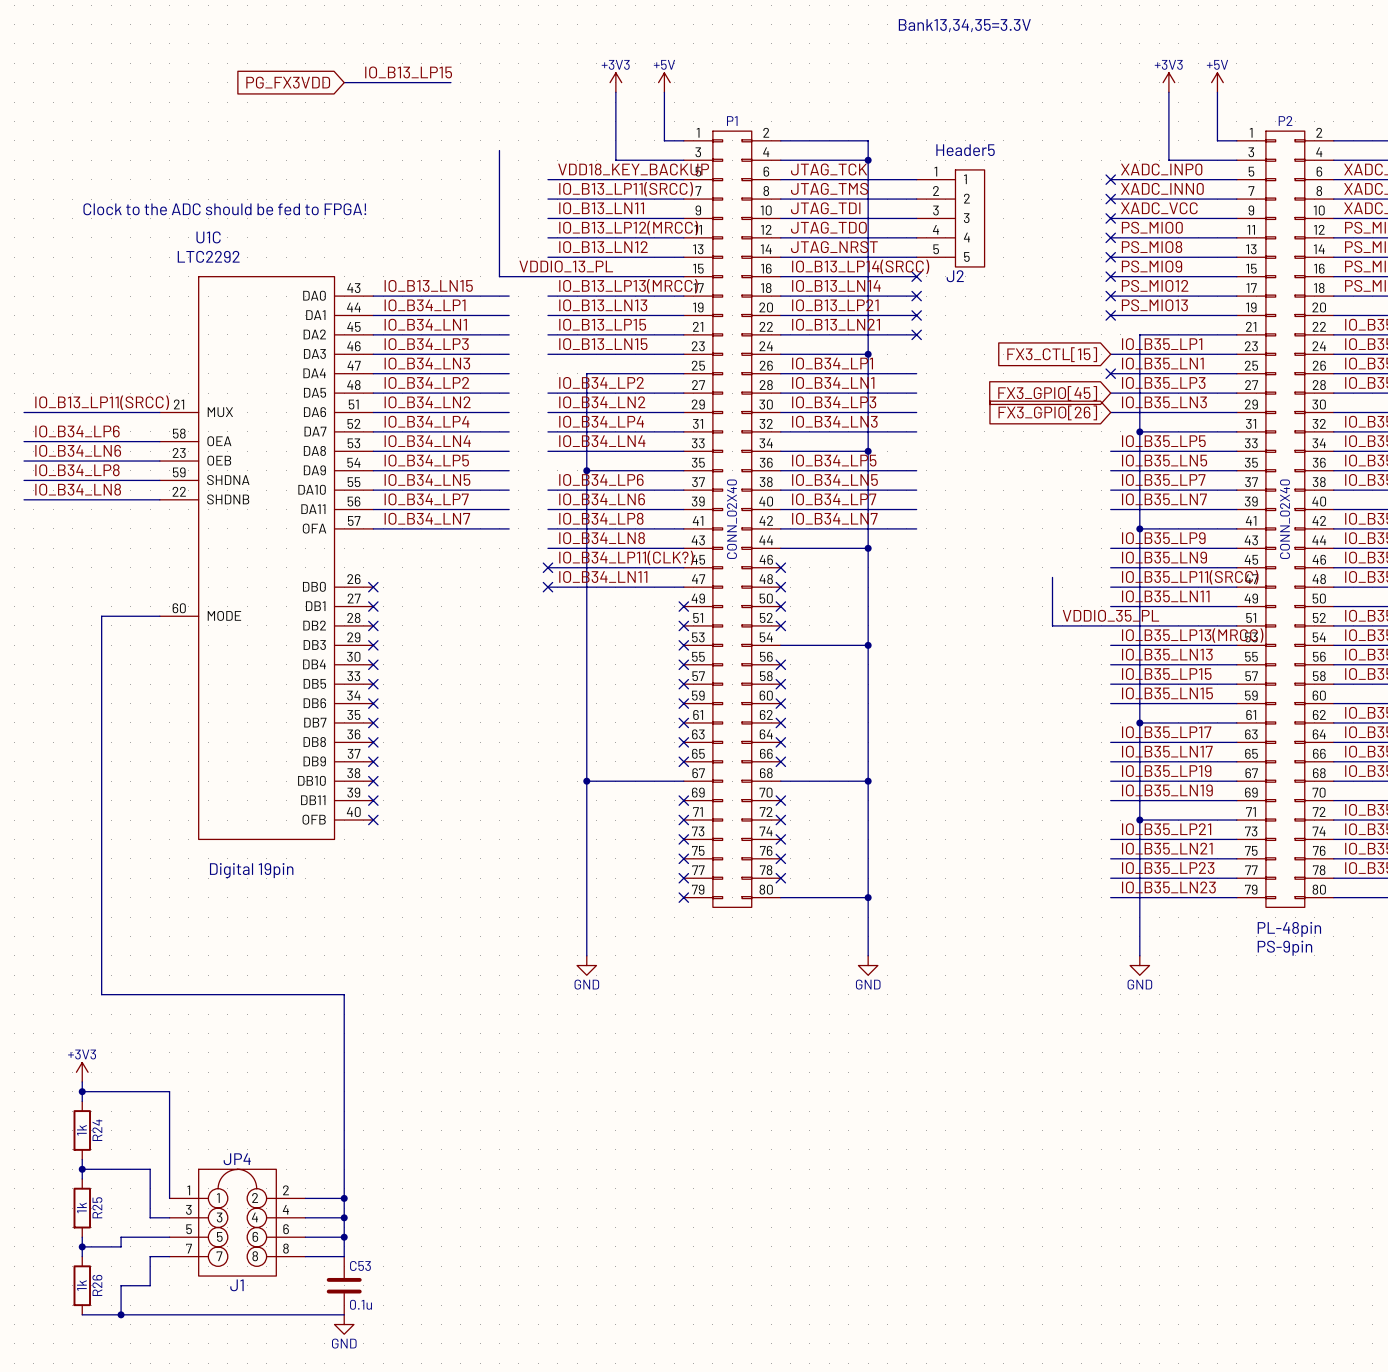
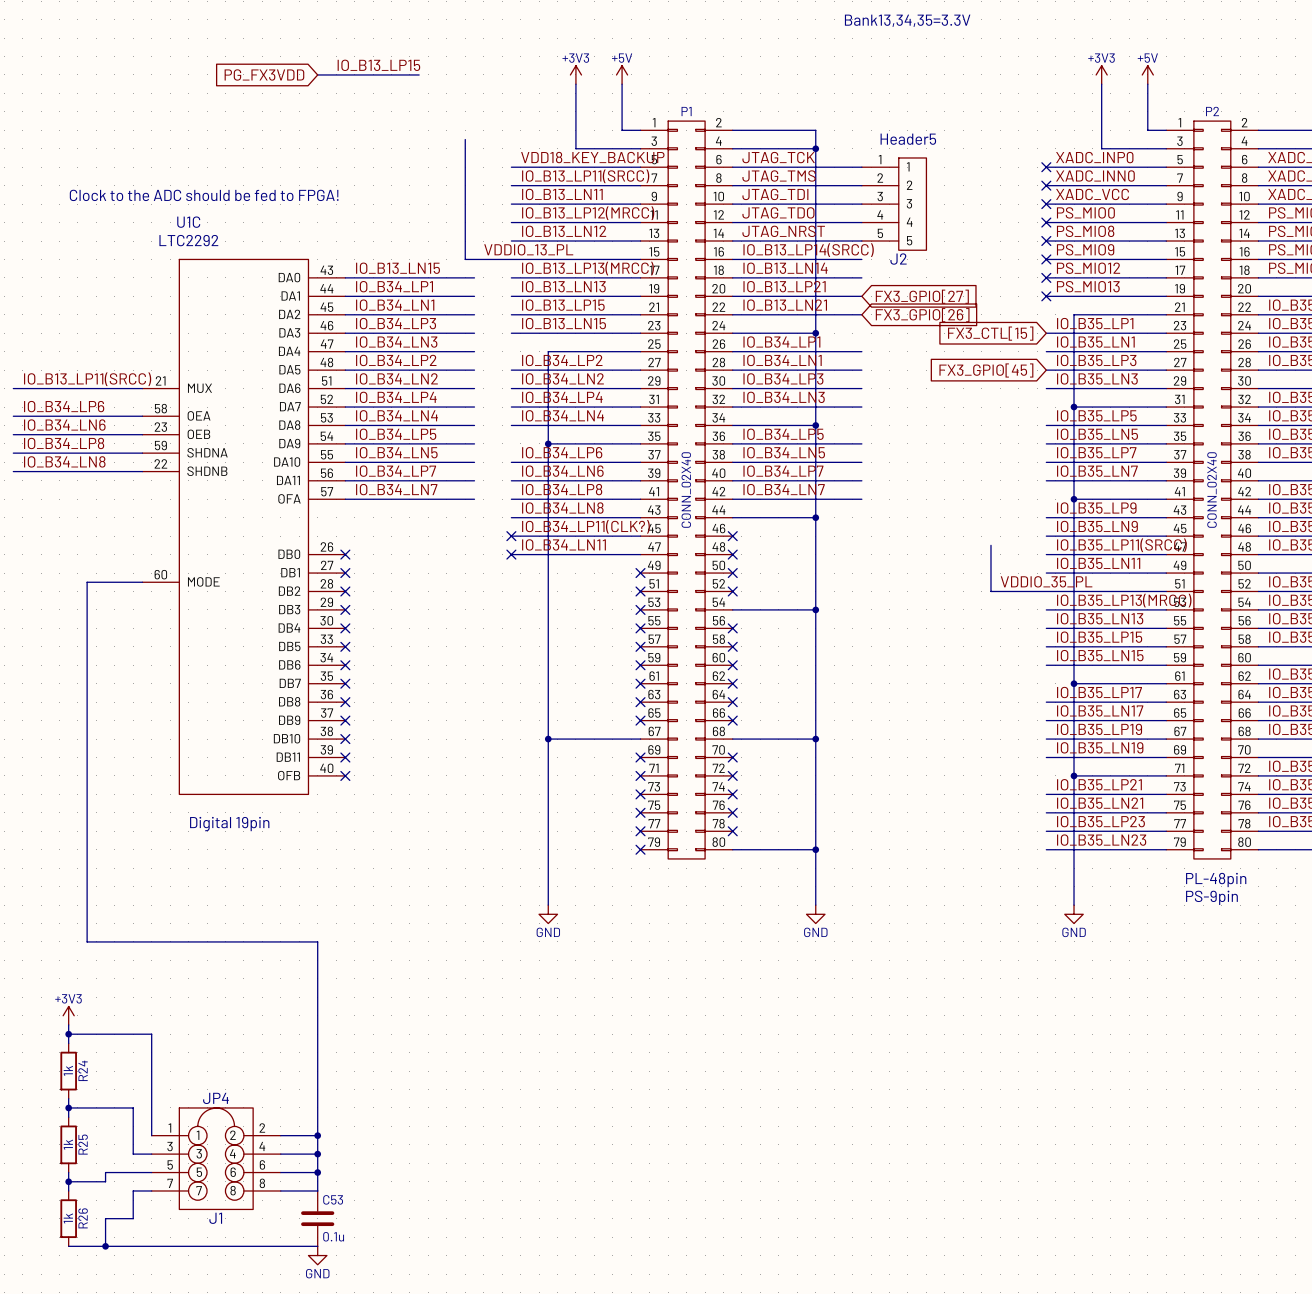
no-connect mark: (916, 276) -> none
no-connect mark: (916, 296) -> none
no-connect mark: (916, 315) -> none
global label: none -> FX3_GPIO[27] (922, 296)
no-connect mark: (916, 334) -> none
global label: none -> FX3_GPIO[26] (922, 315)
no-connect mark: (1110, 373) -> none
global label: FX3_GPIO[26] (1047, 412) -> none

